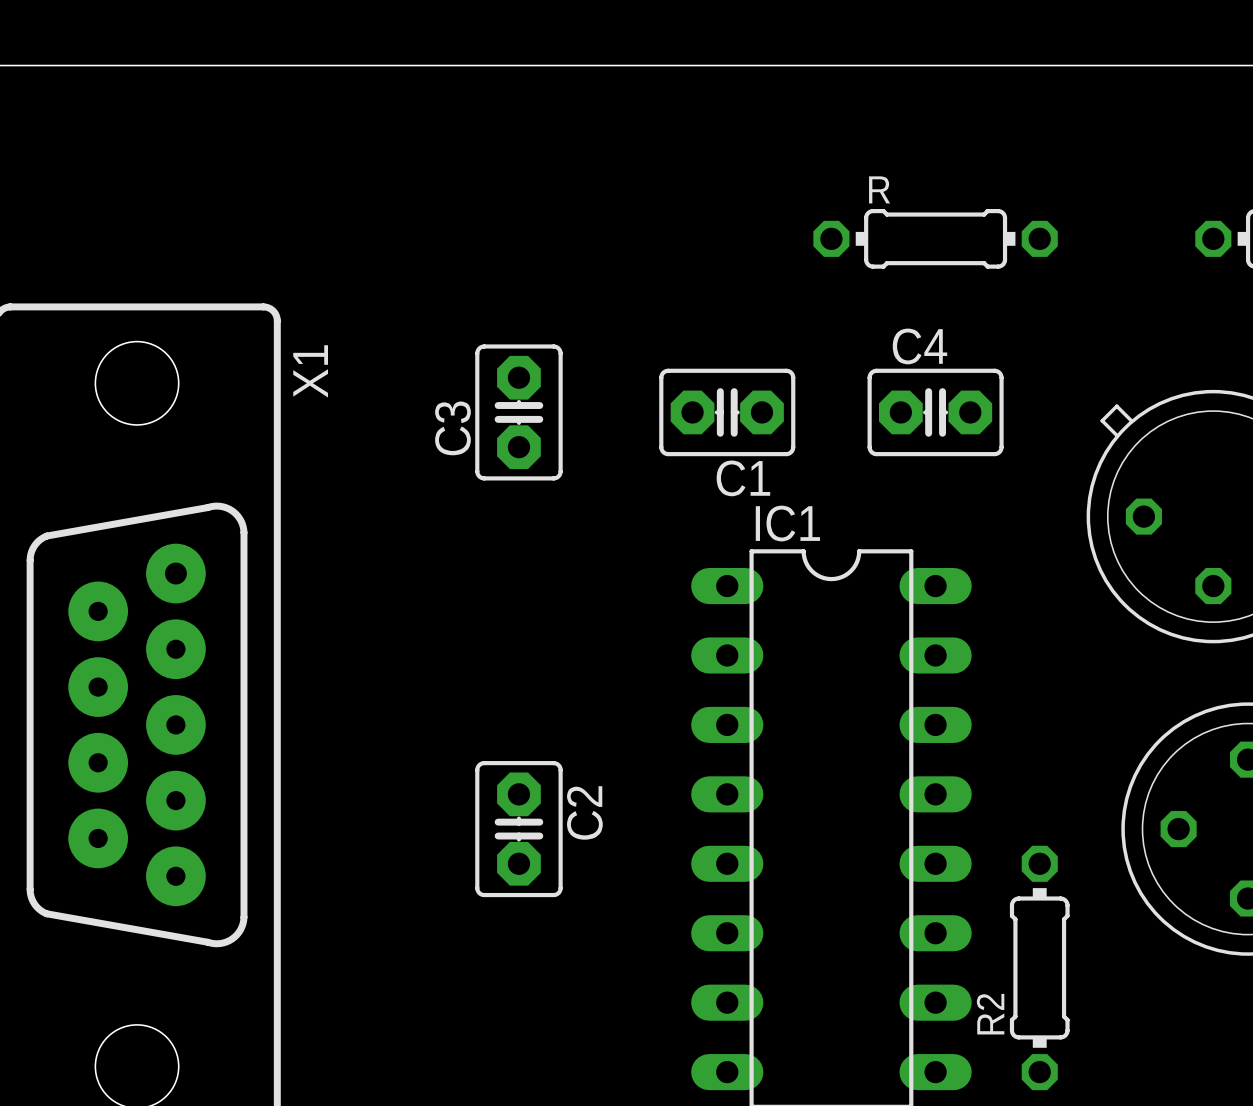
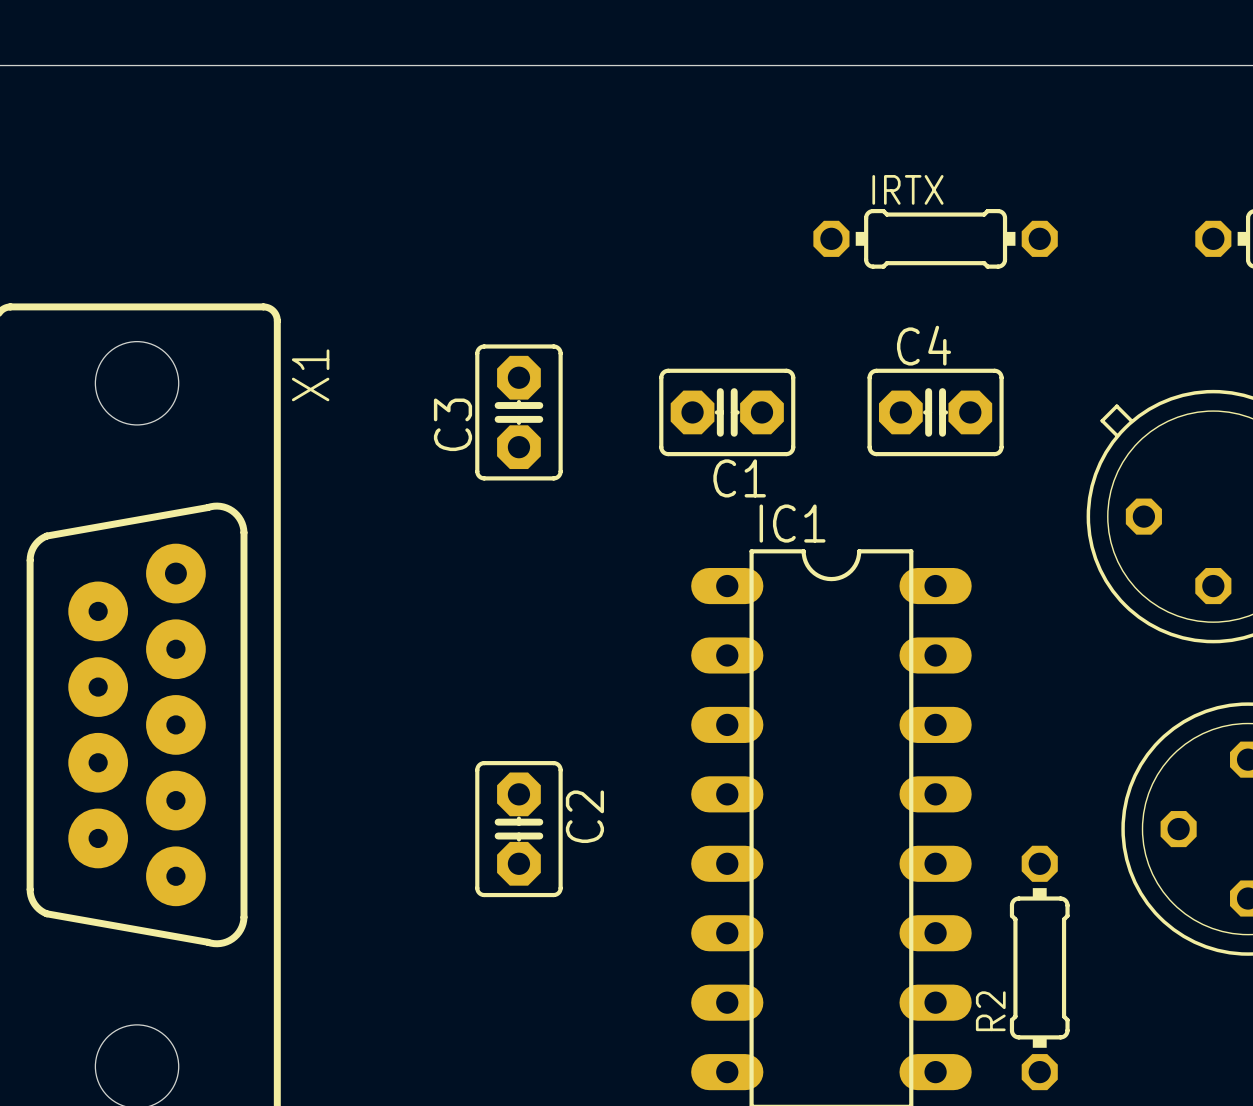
R name: R (879, 189) -> IRTX (907, 189)

